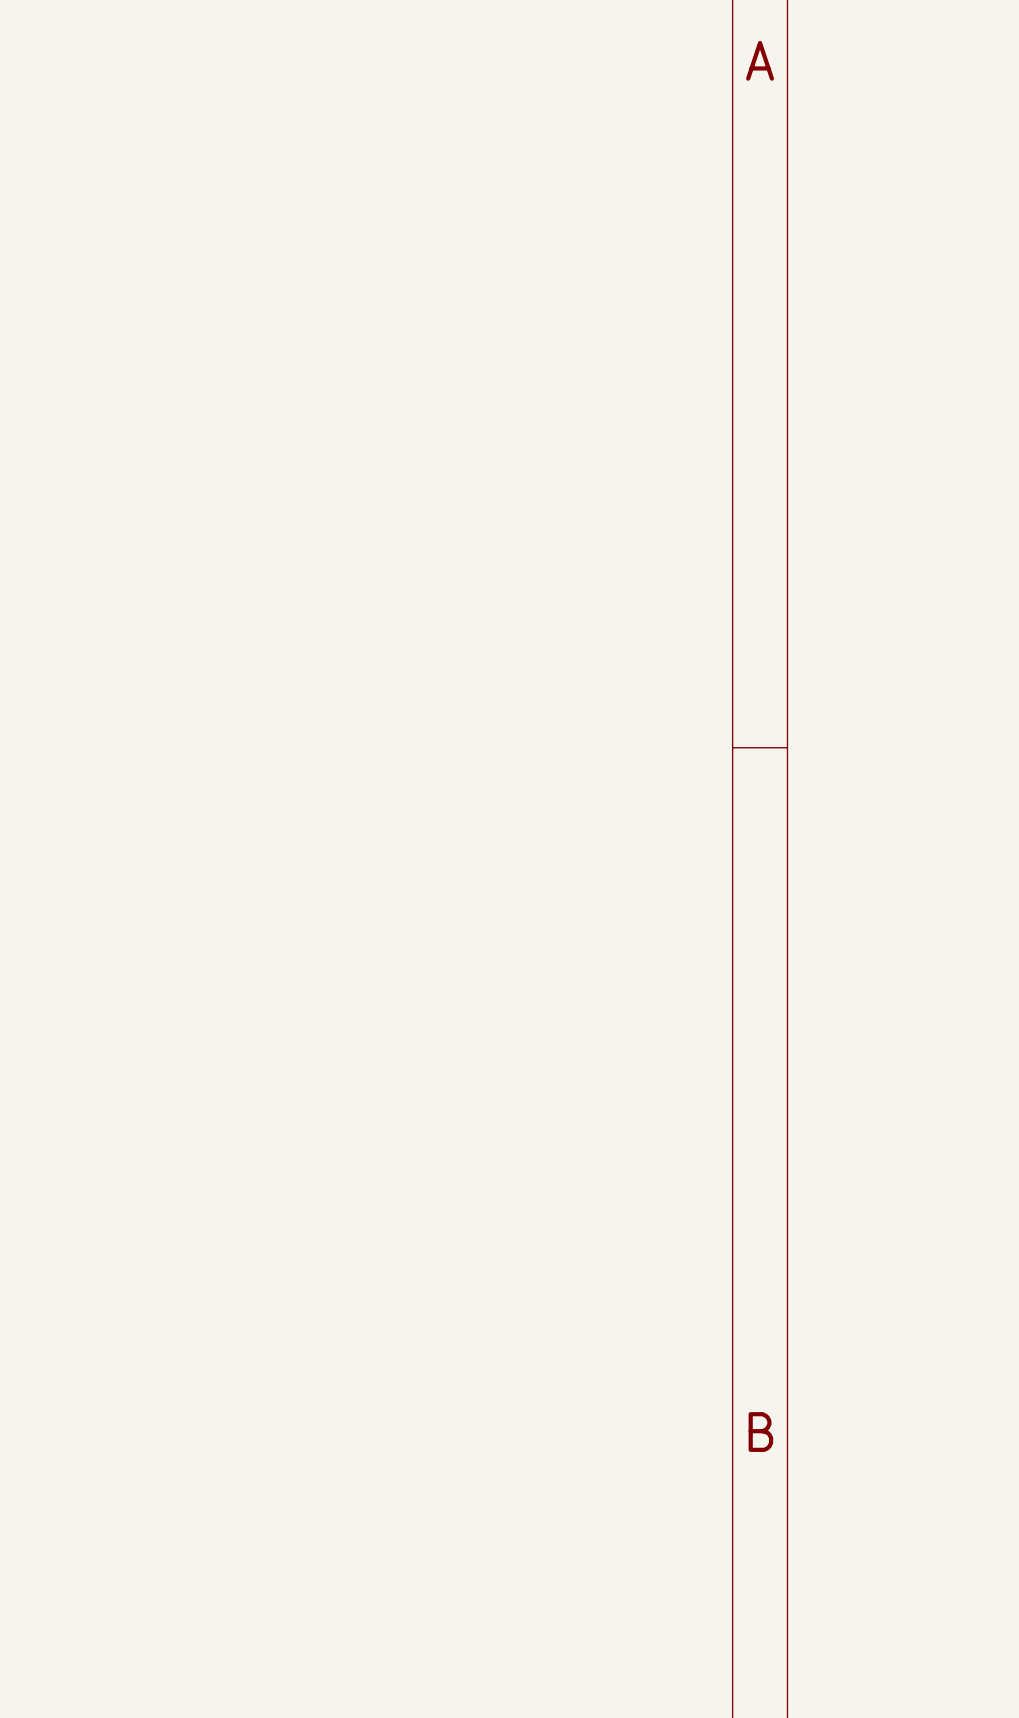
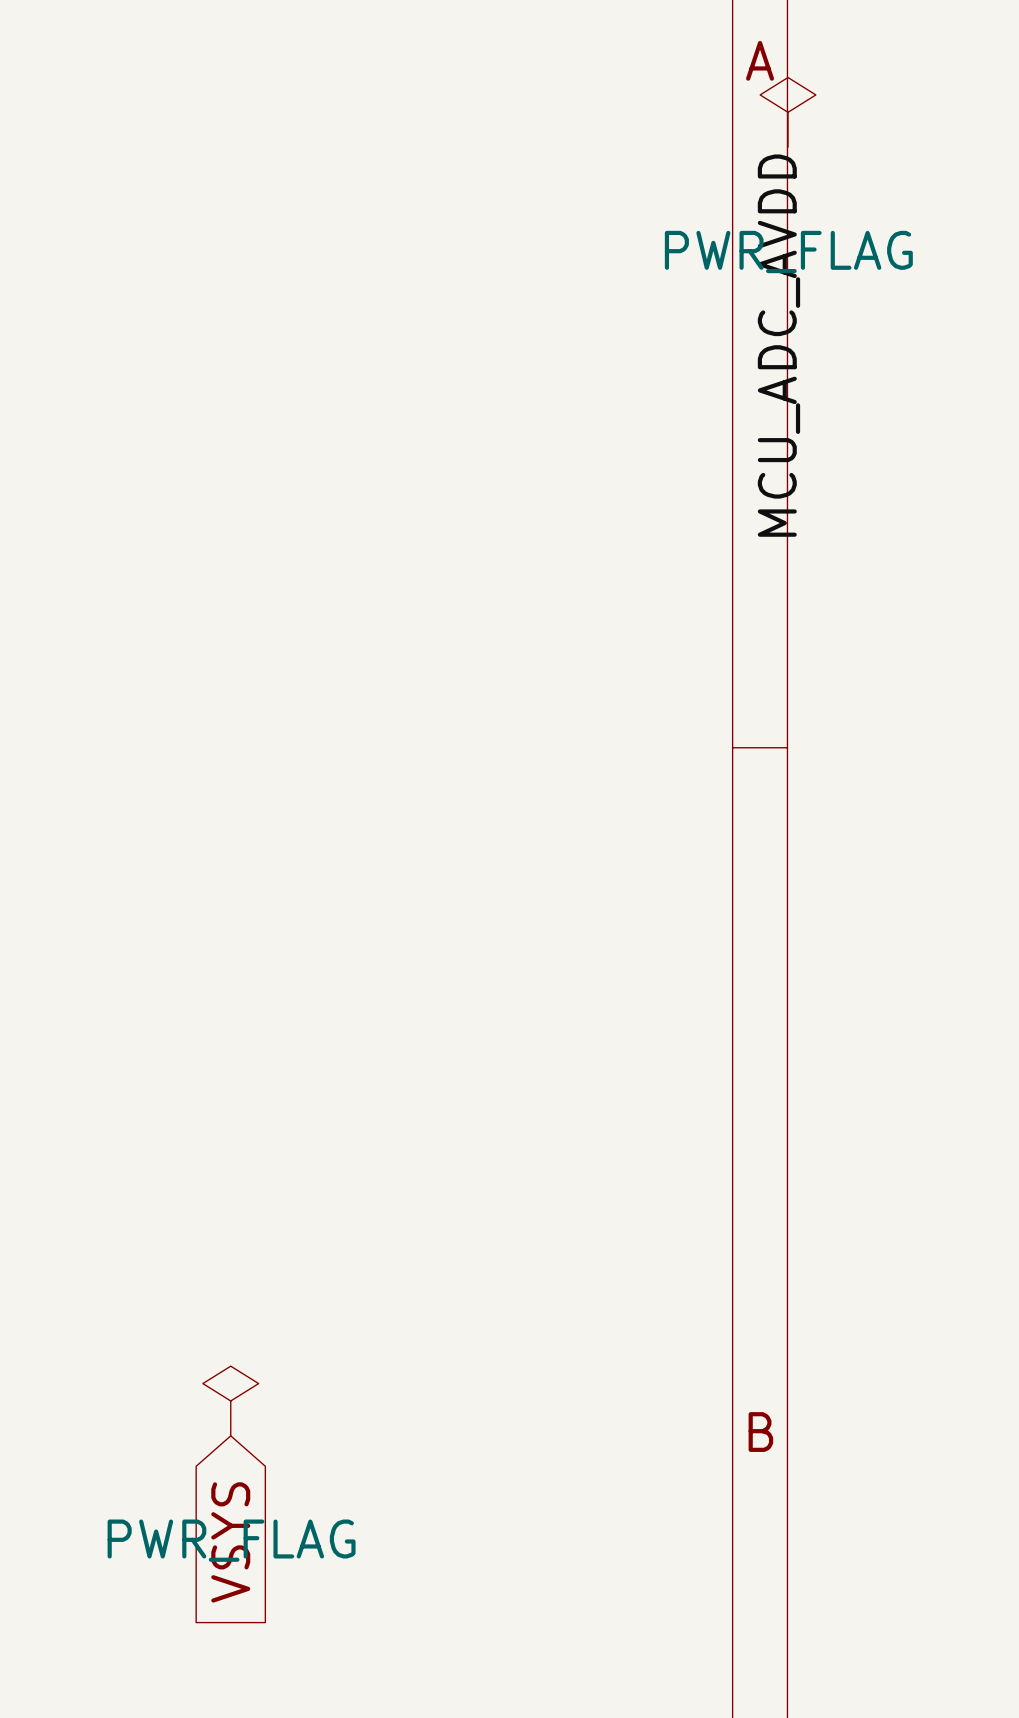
power symbol: none -> PWR_FLAG (788, 112)
label: none -> MCU_ADC_AVDD (778, 345)
power symbol: none -> PWR_FLAG (230, 1400)
global label: none -> VSYS (230, 1542)

